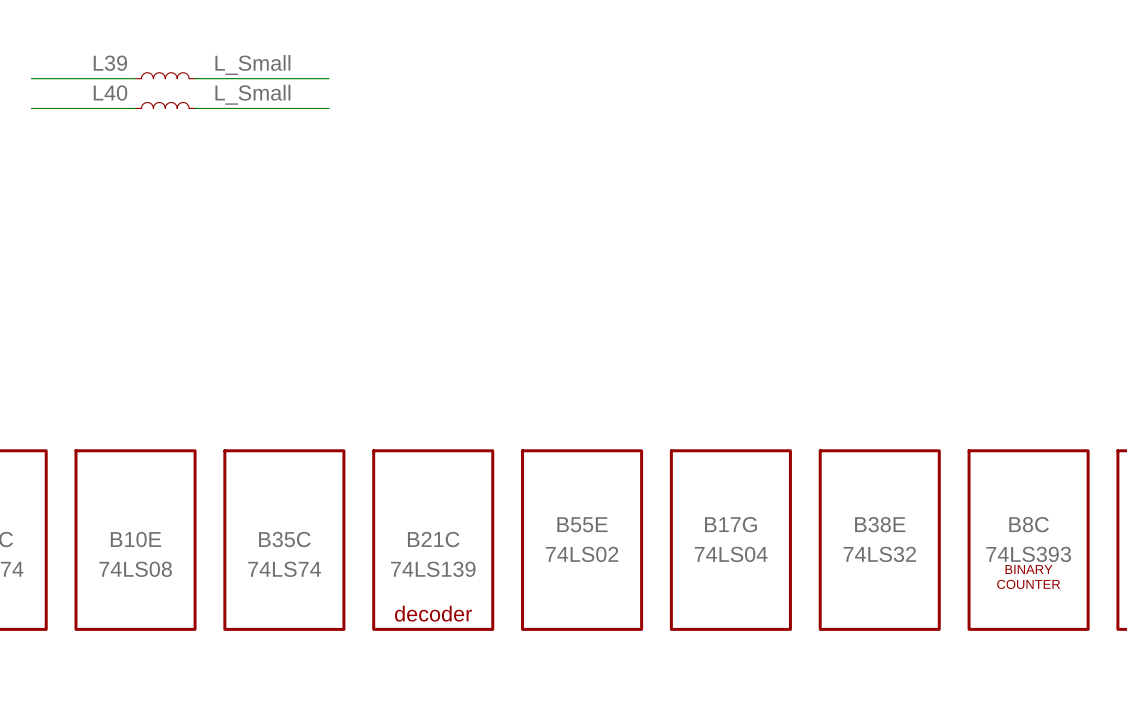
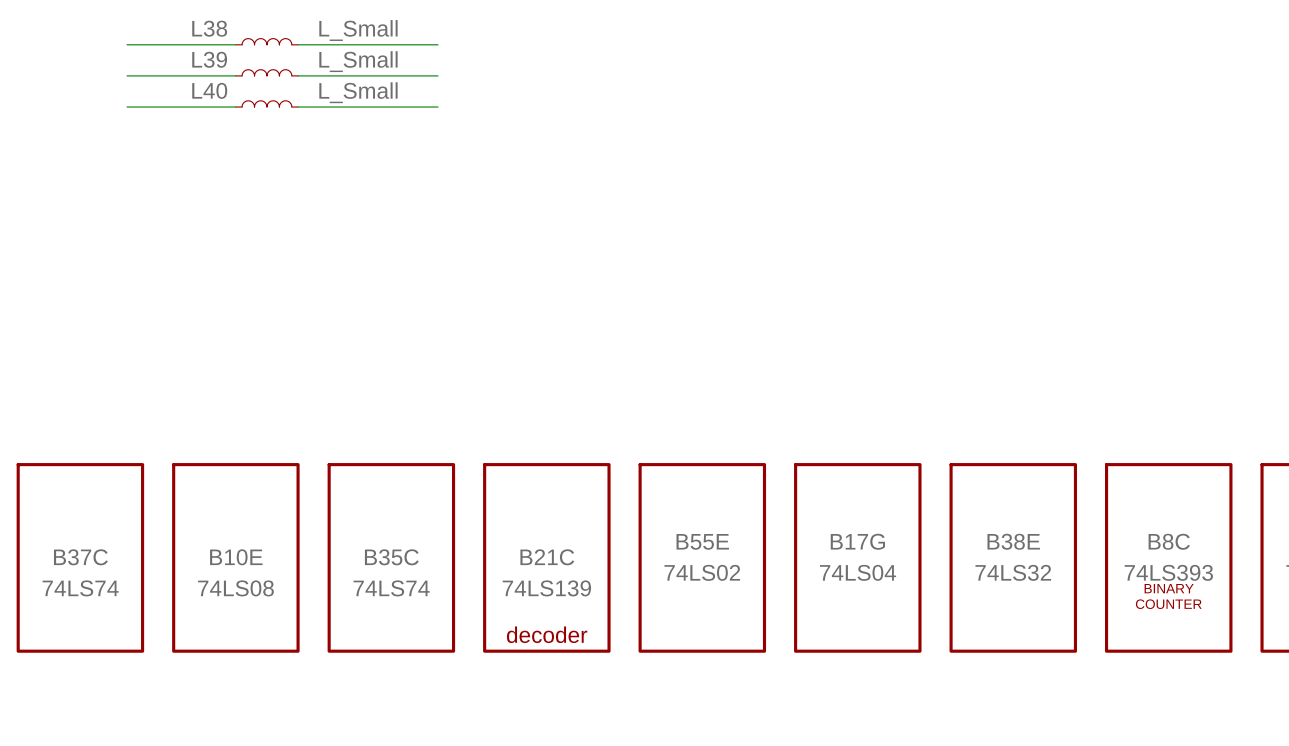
L38: none -> L_Small (266, 41)
wire: none -> (127, 44) (235, 44)
wire: none -> (298, 44) (437, 44)

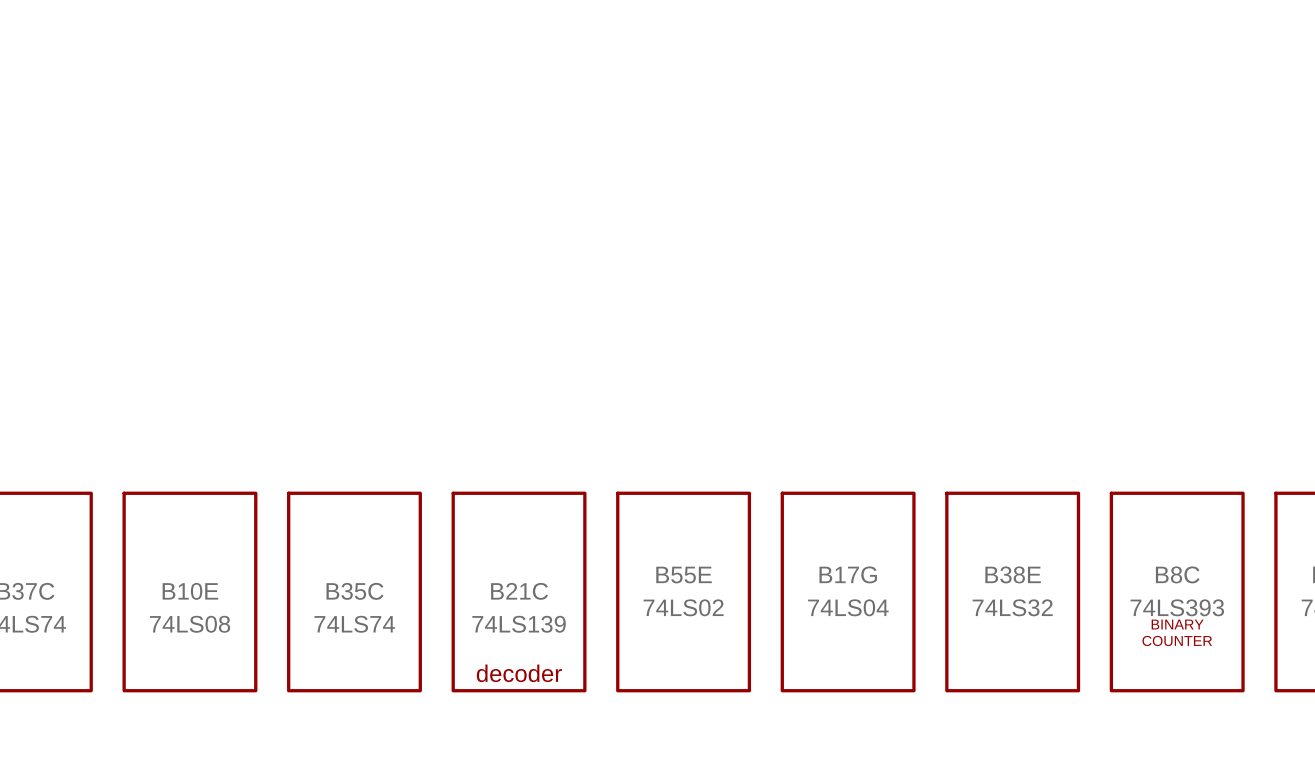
L38: L_Small (266, 41) -> none
wire: (127, 44) (235, 44) -> none
wire: (298, 44) (437, 44) -> none
L39: L_Small (266, 72) -> none
wire: (127, 75) (235, 75) -> none
wire: (298, 75) (437, 75) -> none
L40: L_Small (266, 103) -> none
wire: (127, 107) (235, 107) -> none
wire: (298, 107) (437, 107) -> none

